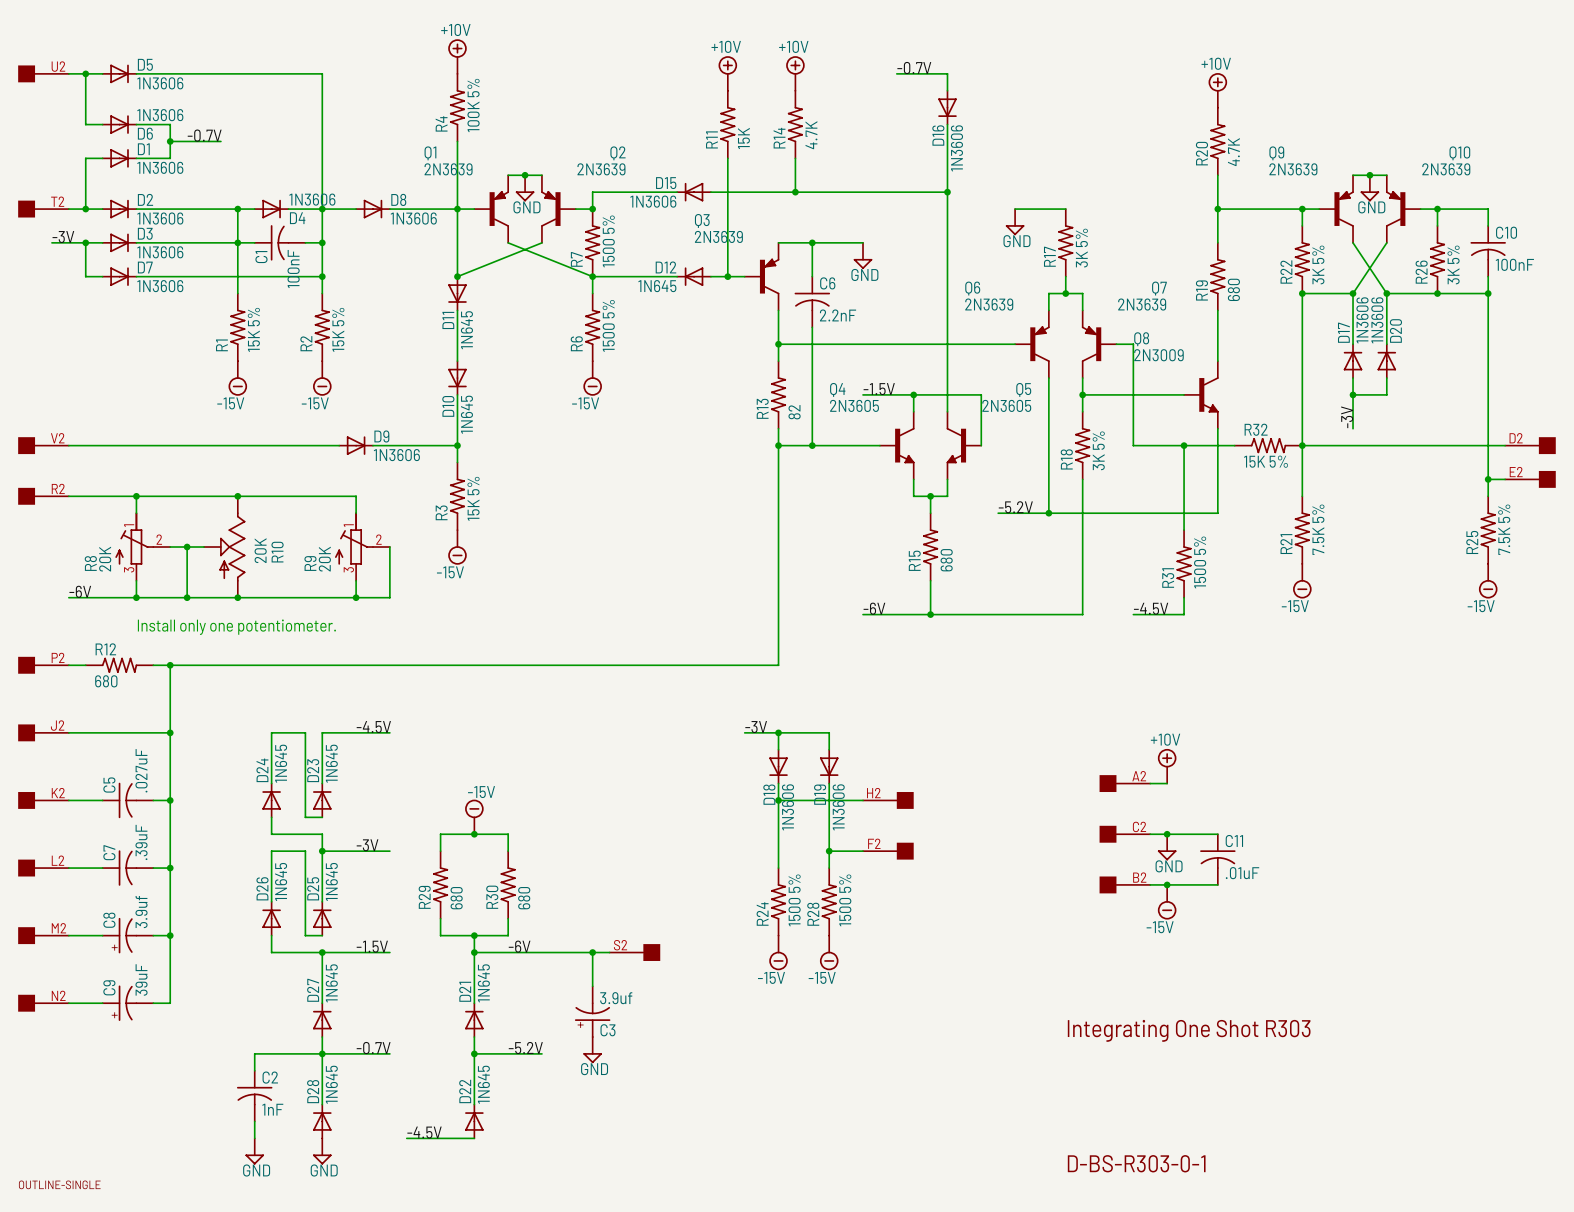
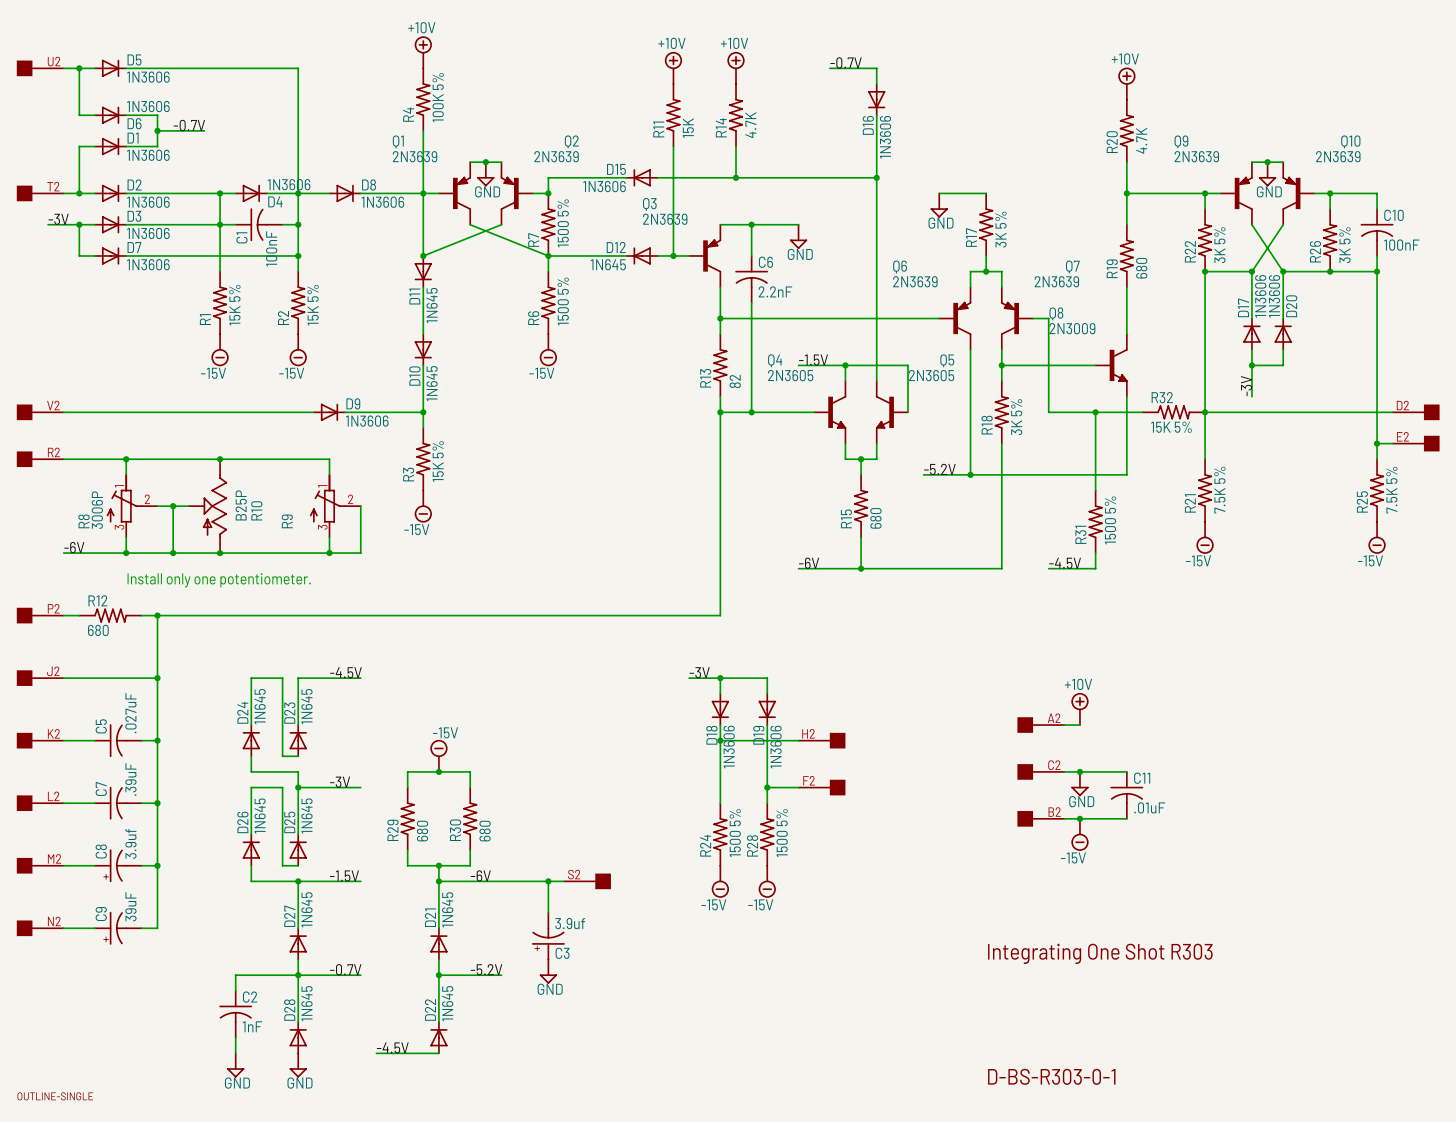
R10 value: 20K (260, 550) -> B25P (241, 505)
R8 value: 20K (105, 559) -> 3006P (97, 510)
R9 value: 20K (324, 559) -> none

